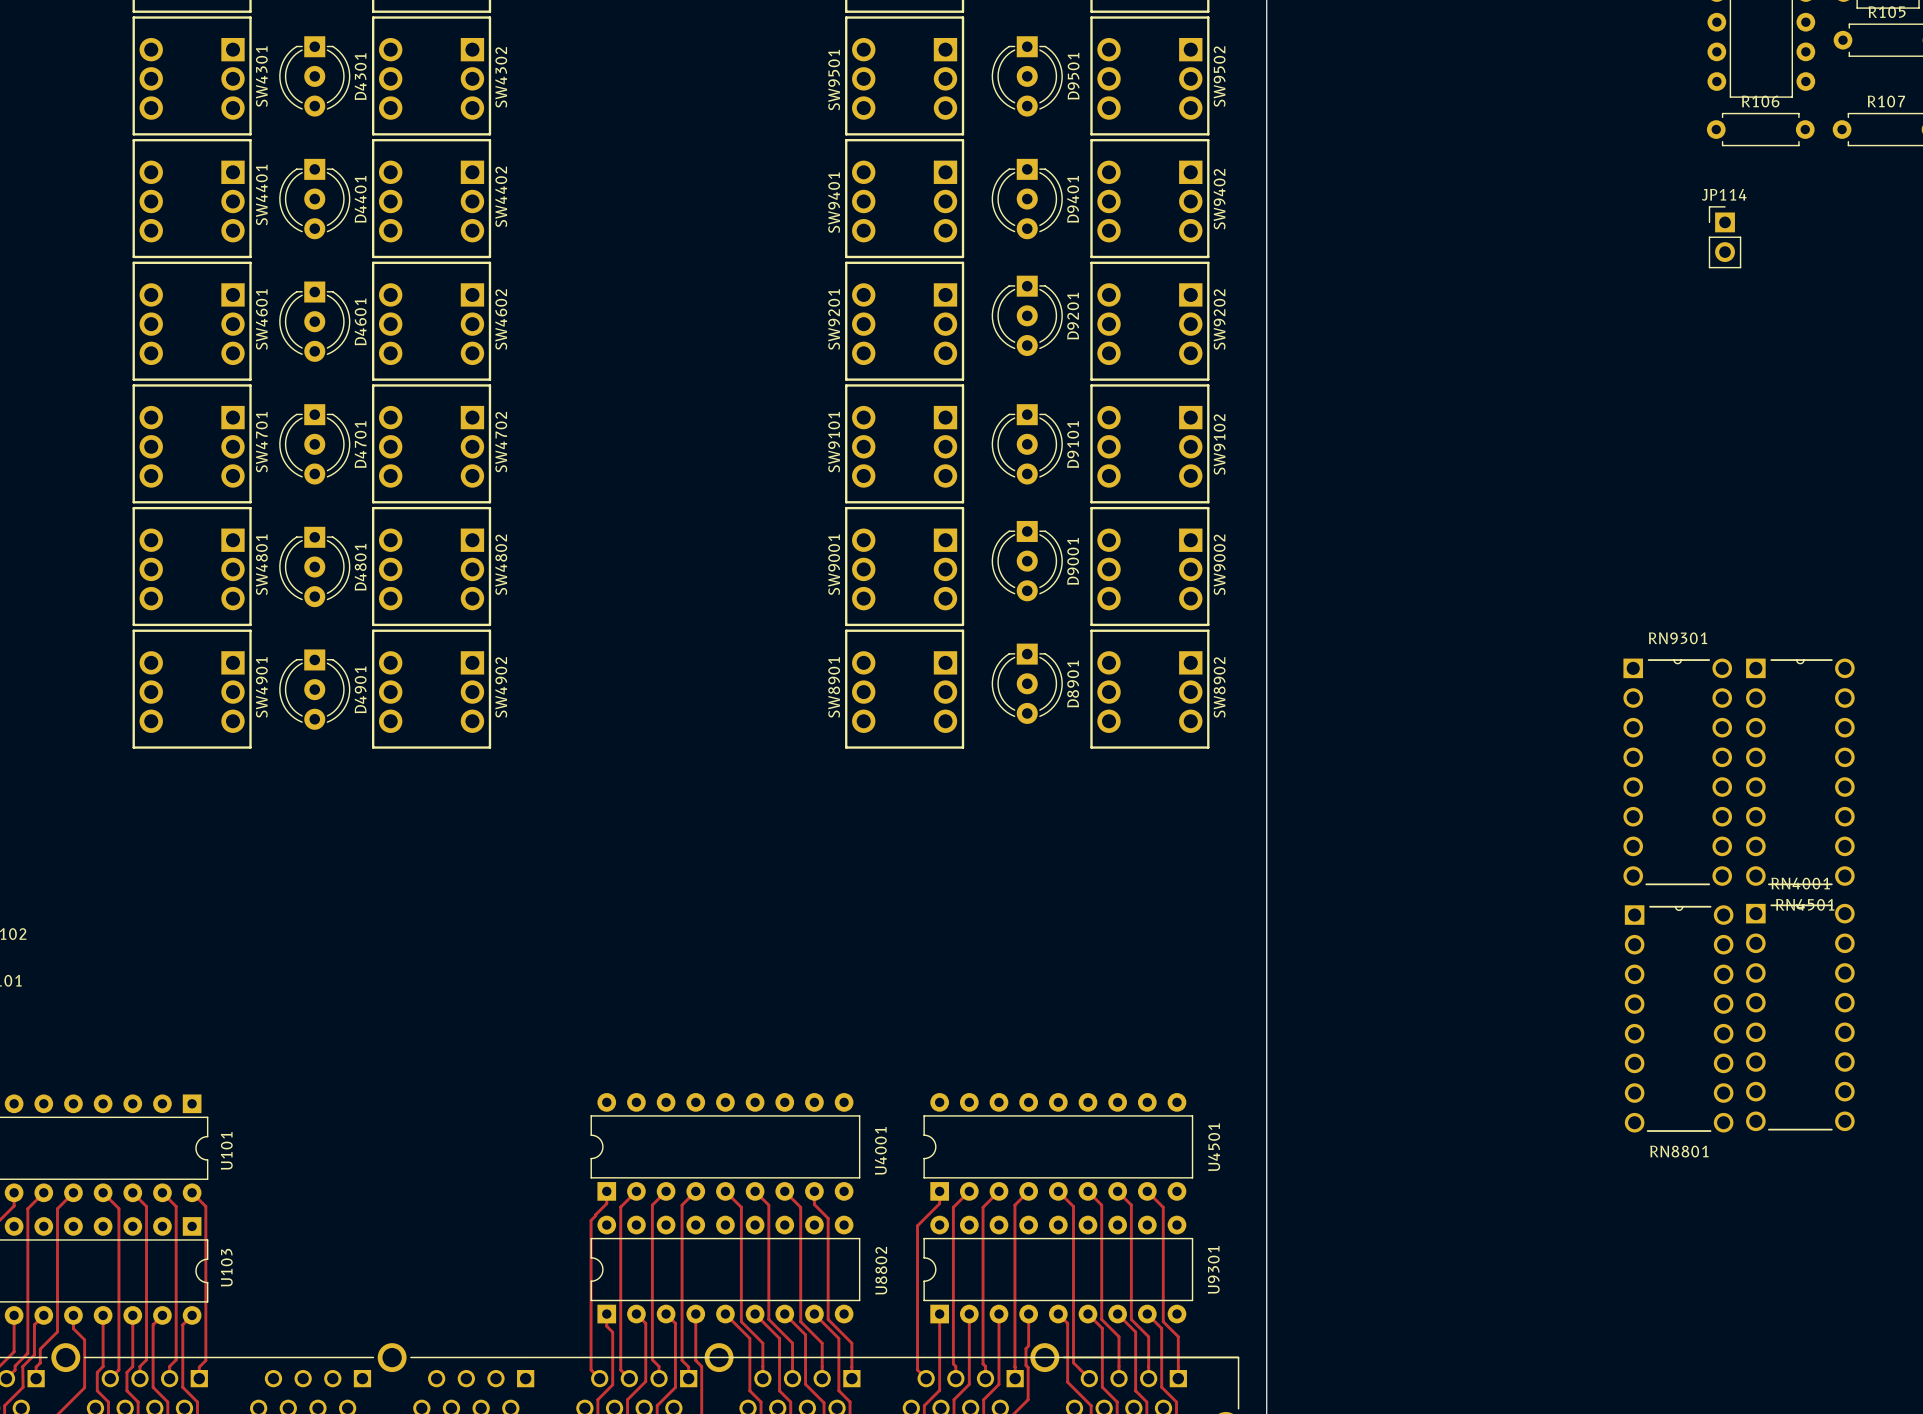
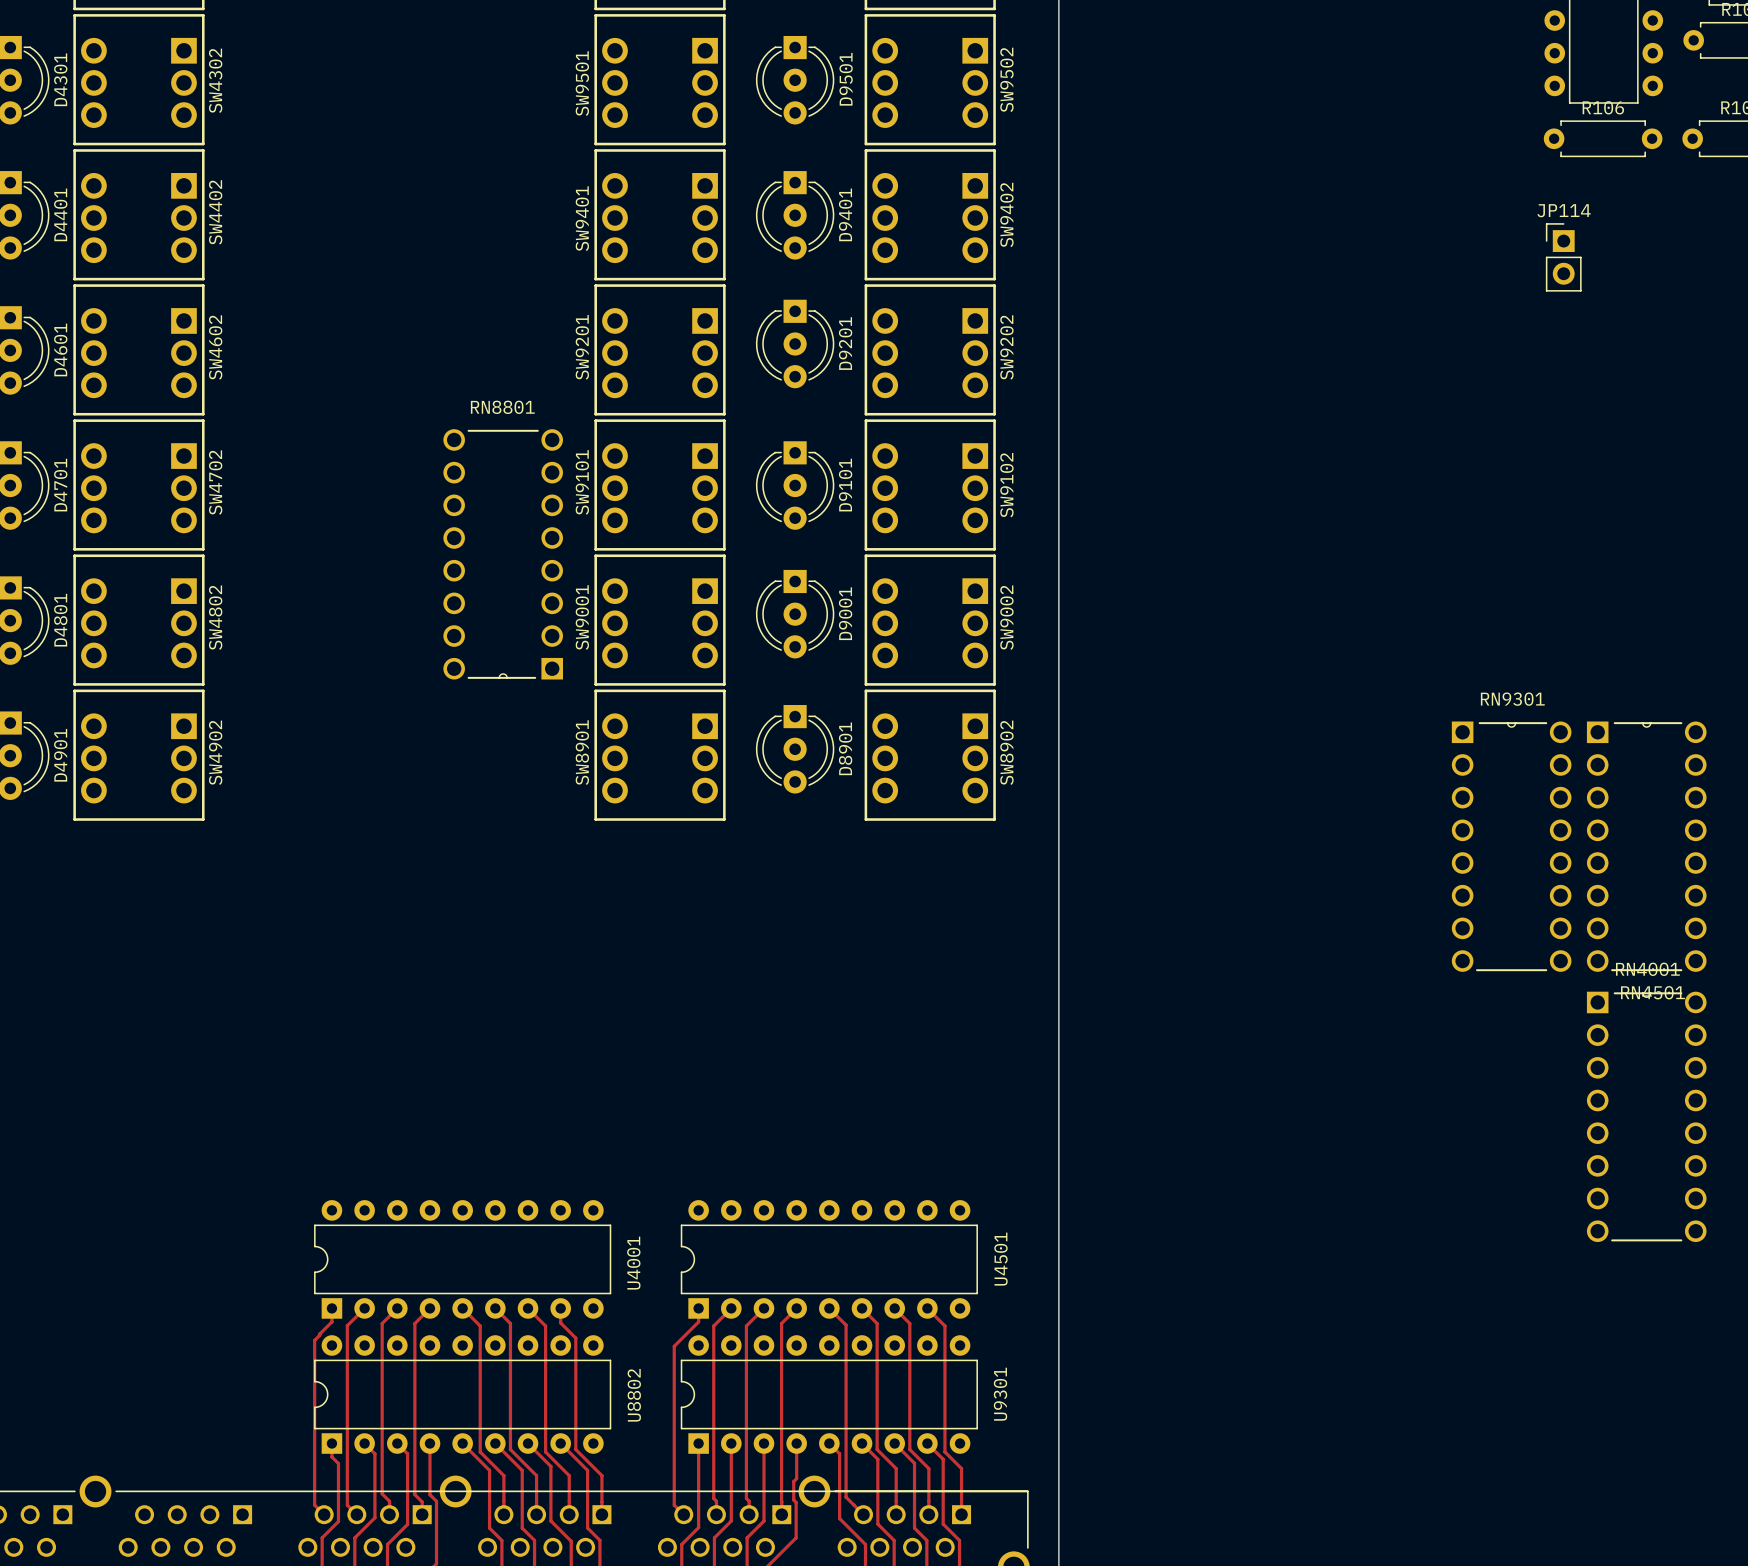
RN8801 rotation: 0° (1679, 1018) -> 180° (503, 554)
RN8801 position: (1679, 1018) -> (503, 554)

